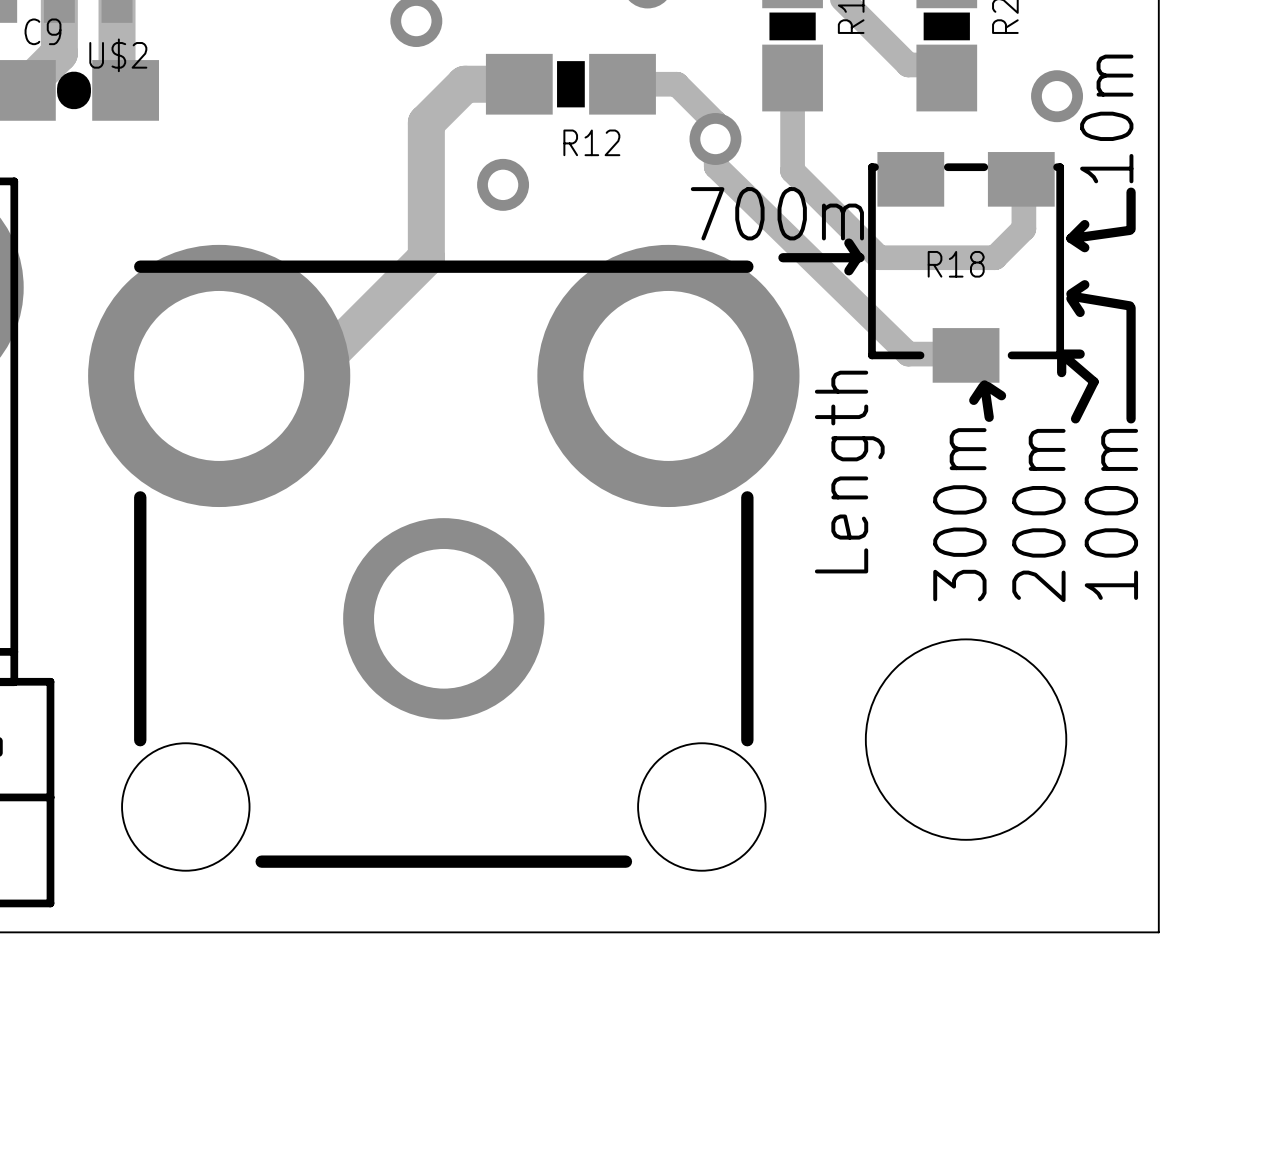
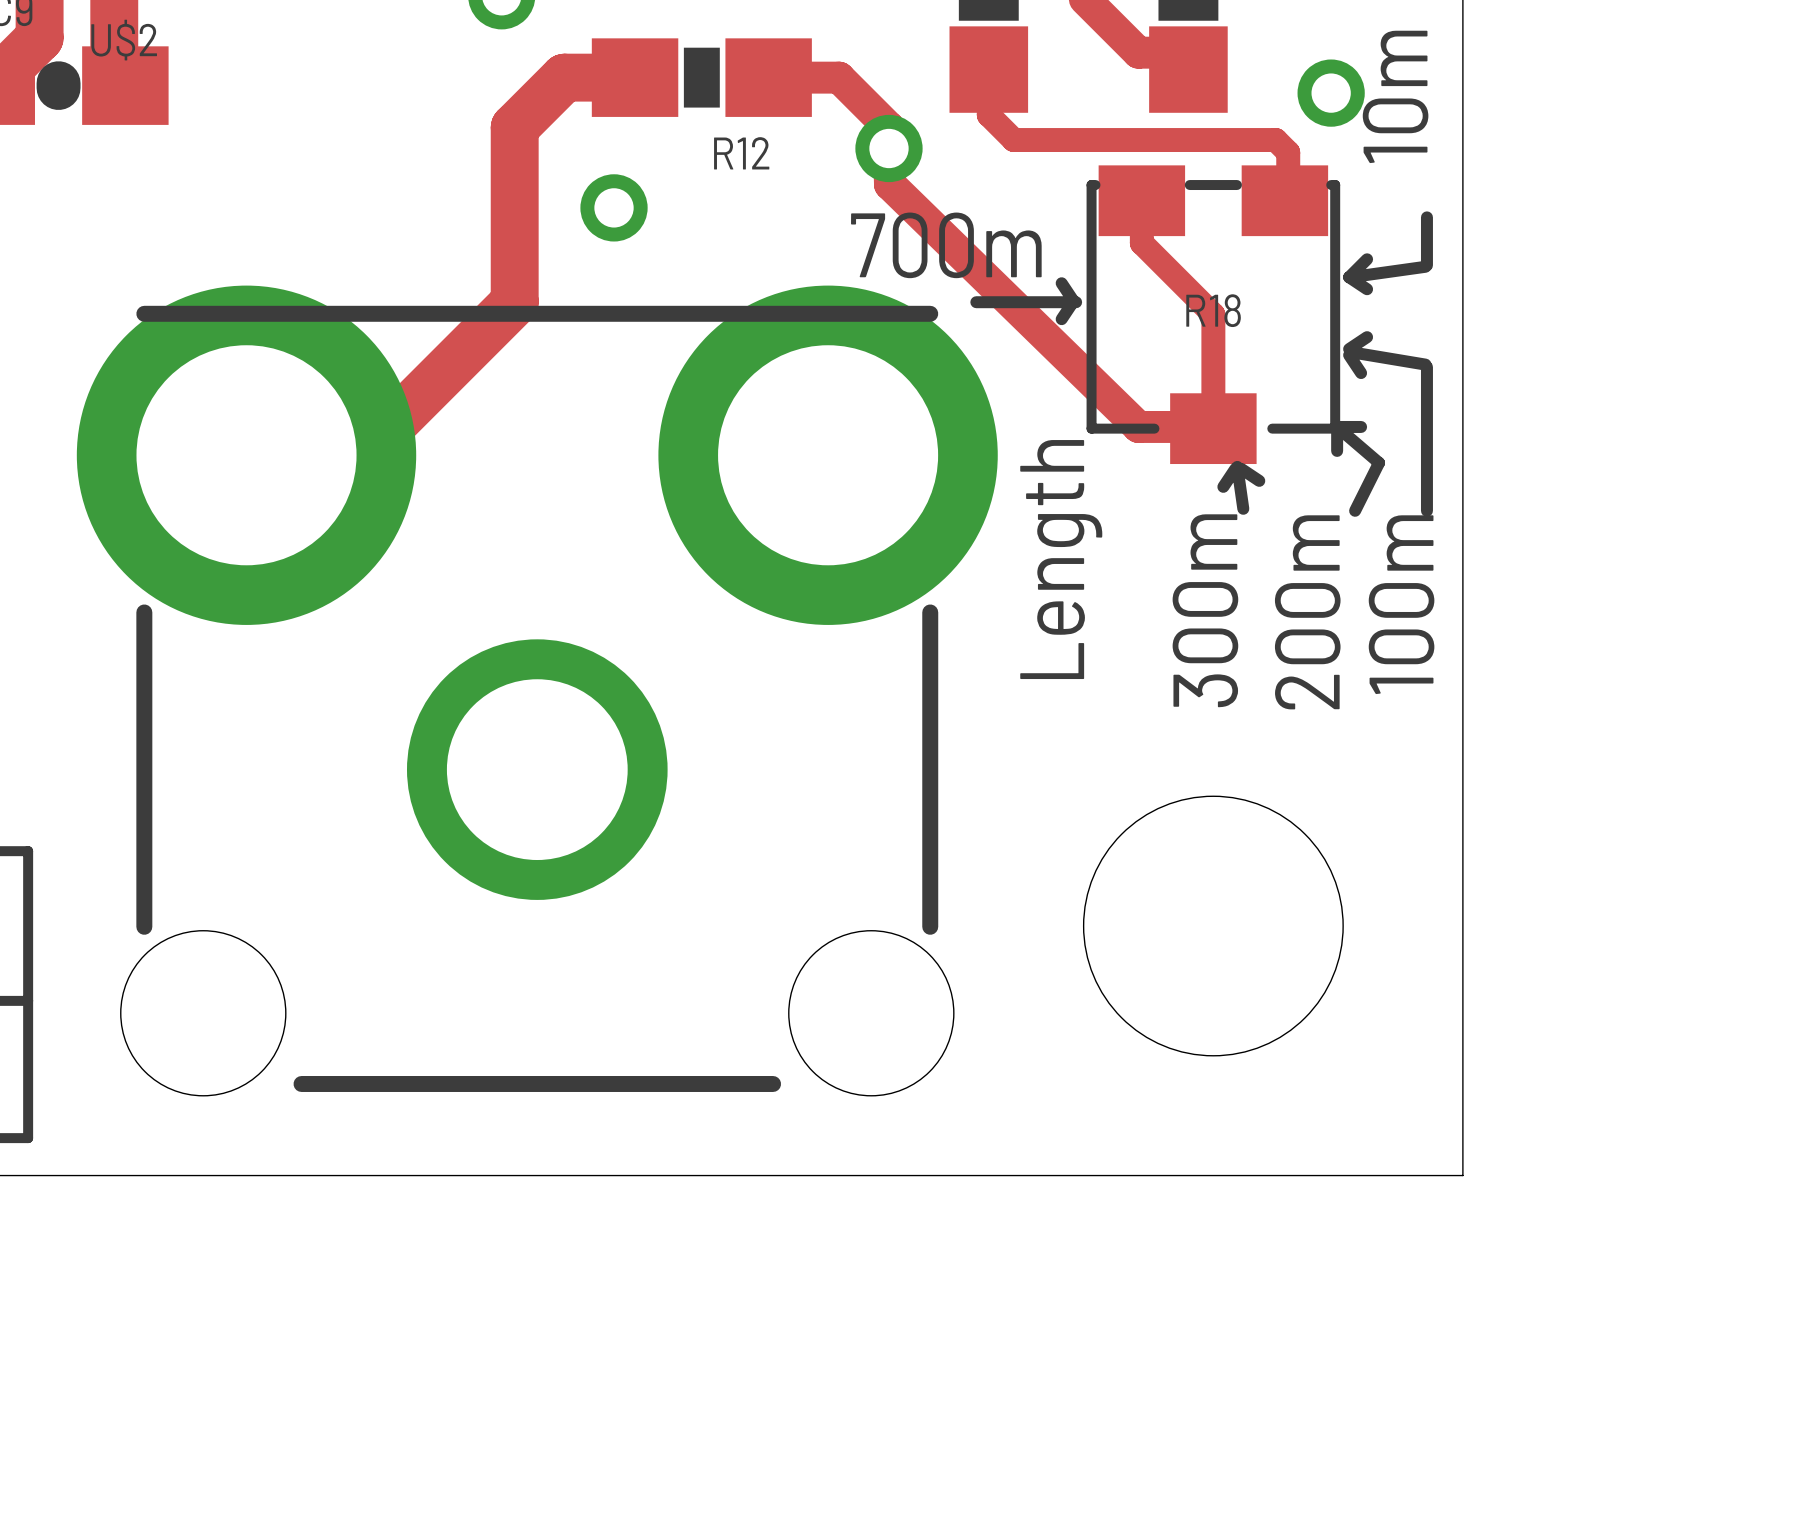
track: (792, 113) (792, 170) (879, 257) (994, 257) (1023, 228) (1023, 181) -> (988, 115) (1013, 140) (1275, 140) (1288, 152) (1288, 197) (1284, 200)
track: none -> (1141, 200) (1141, 243) (1213, 314) (1213, 428)

